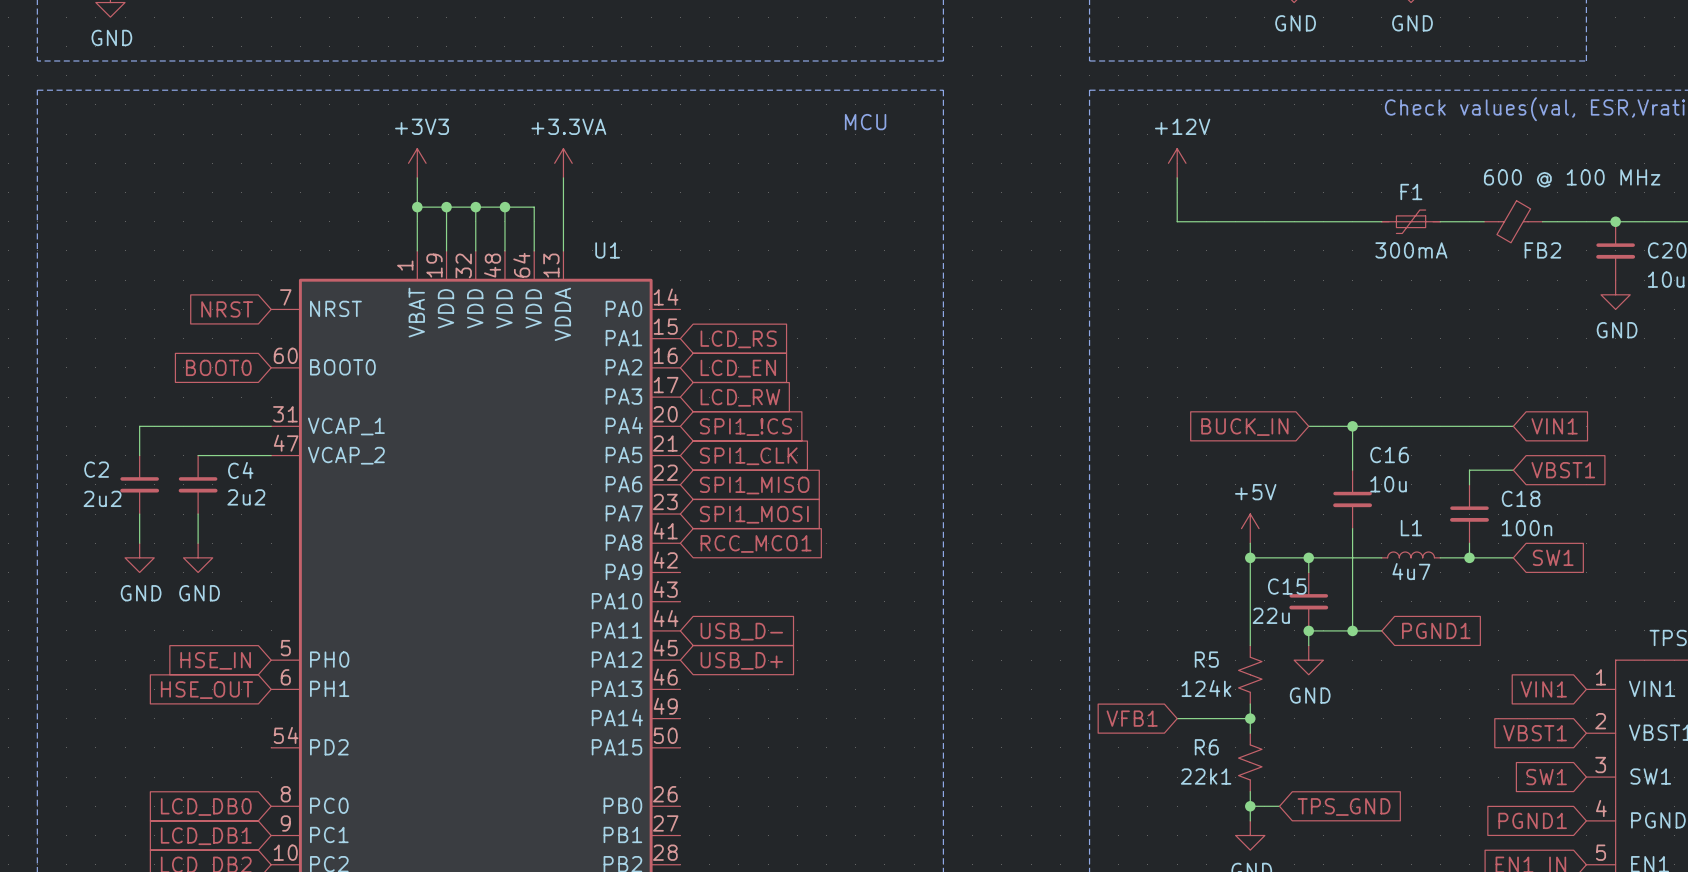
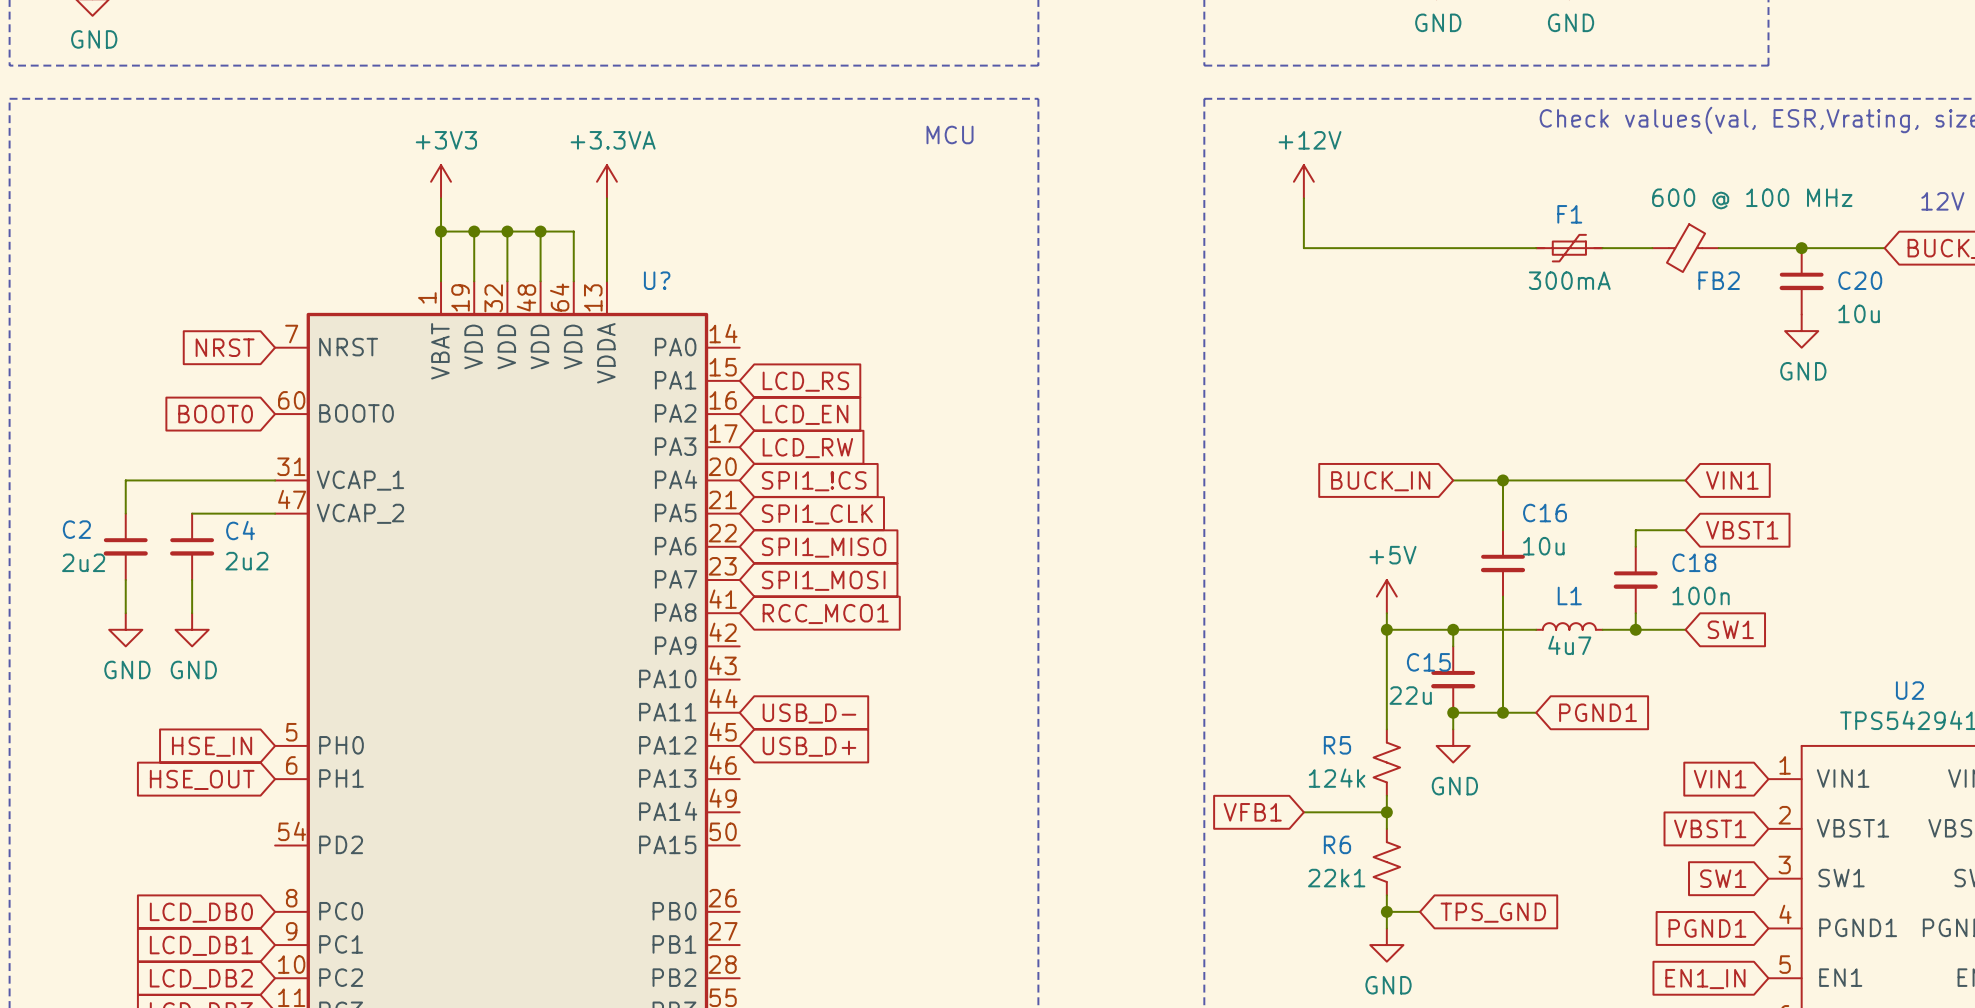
U1 name: U1 (607, 250) -> U? (657, 280)

